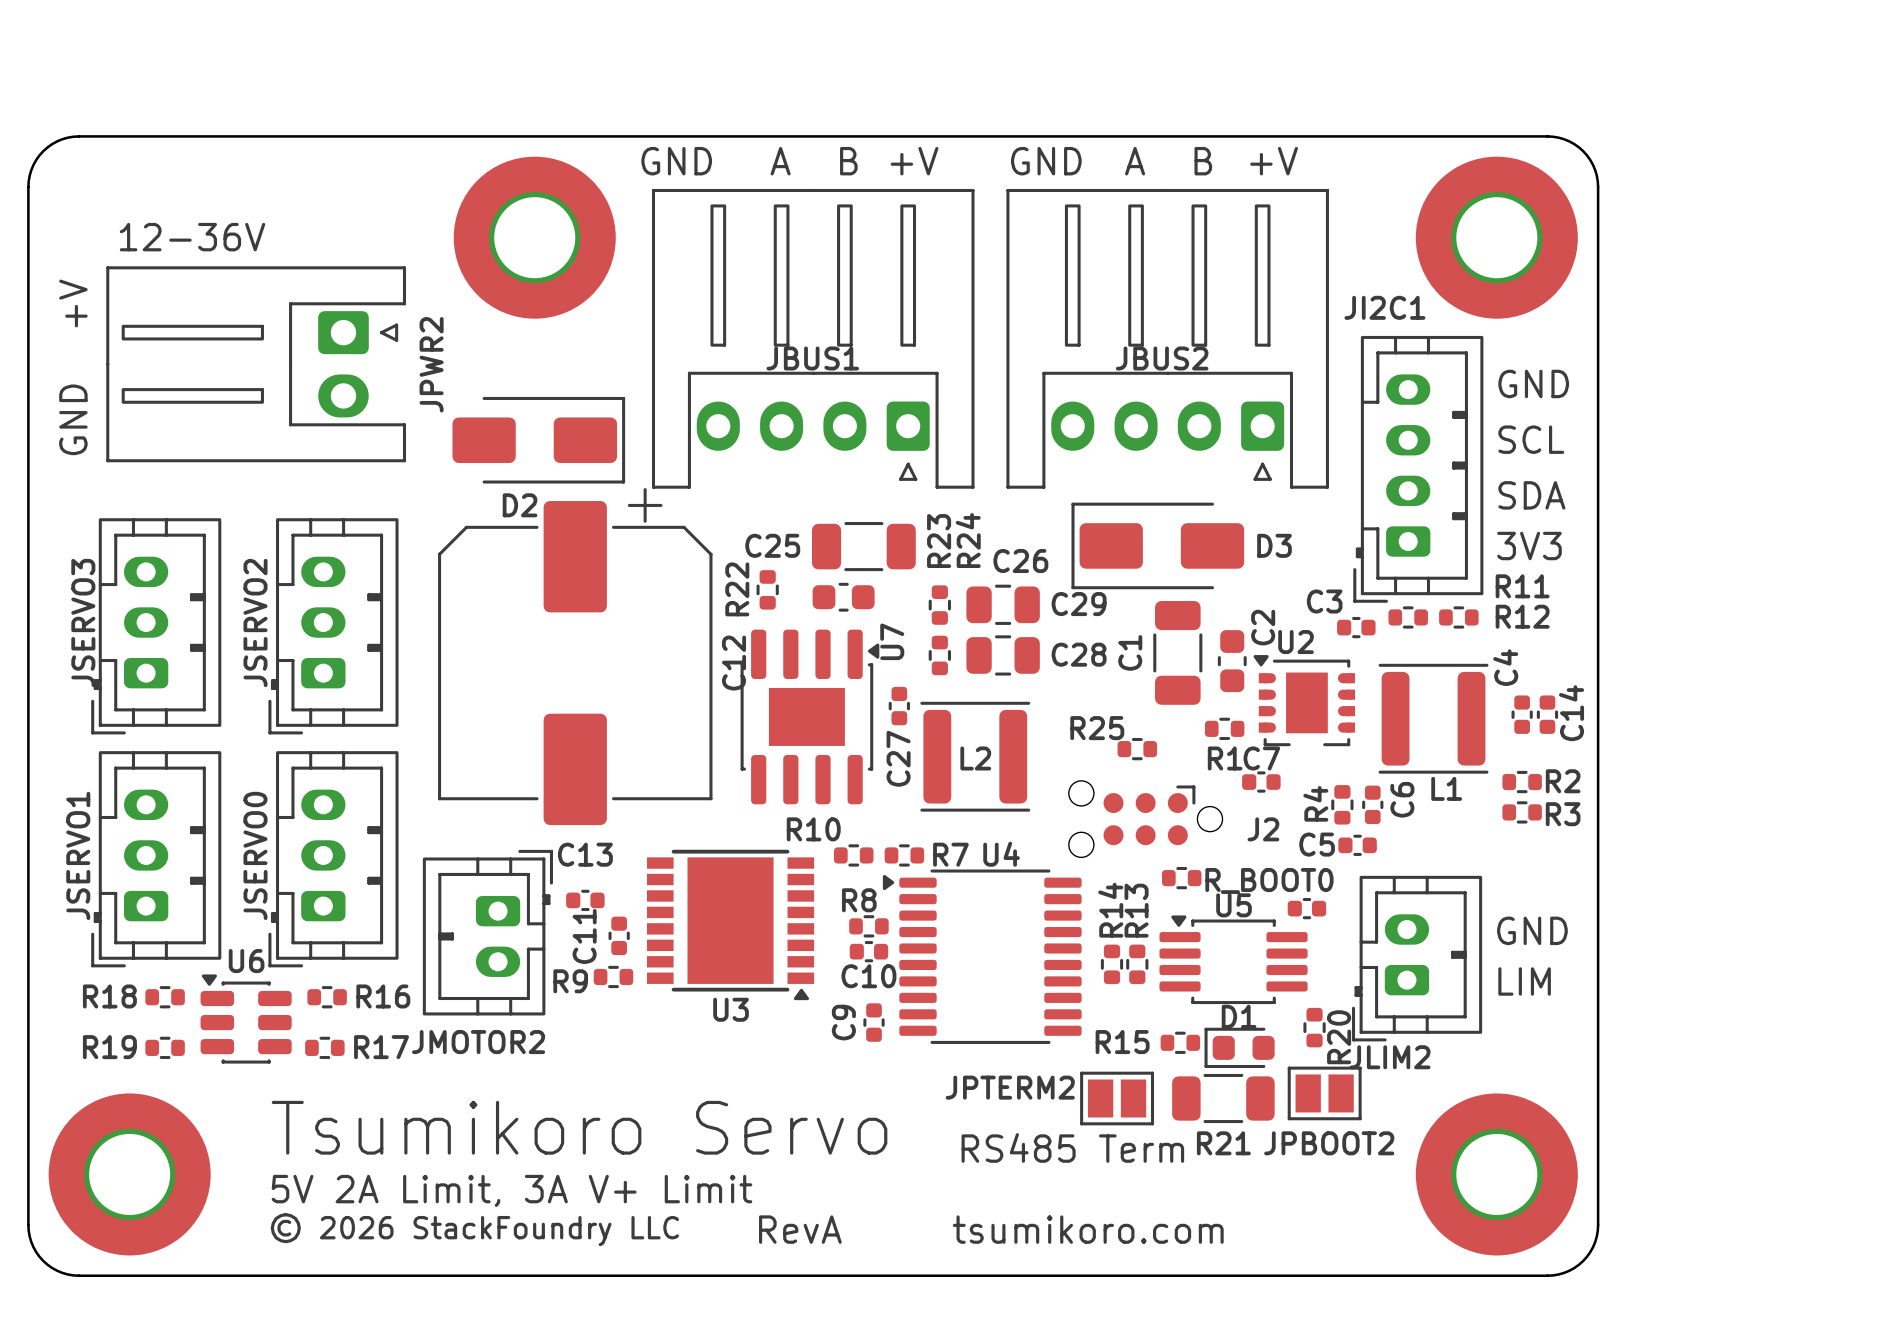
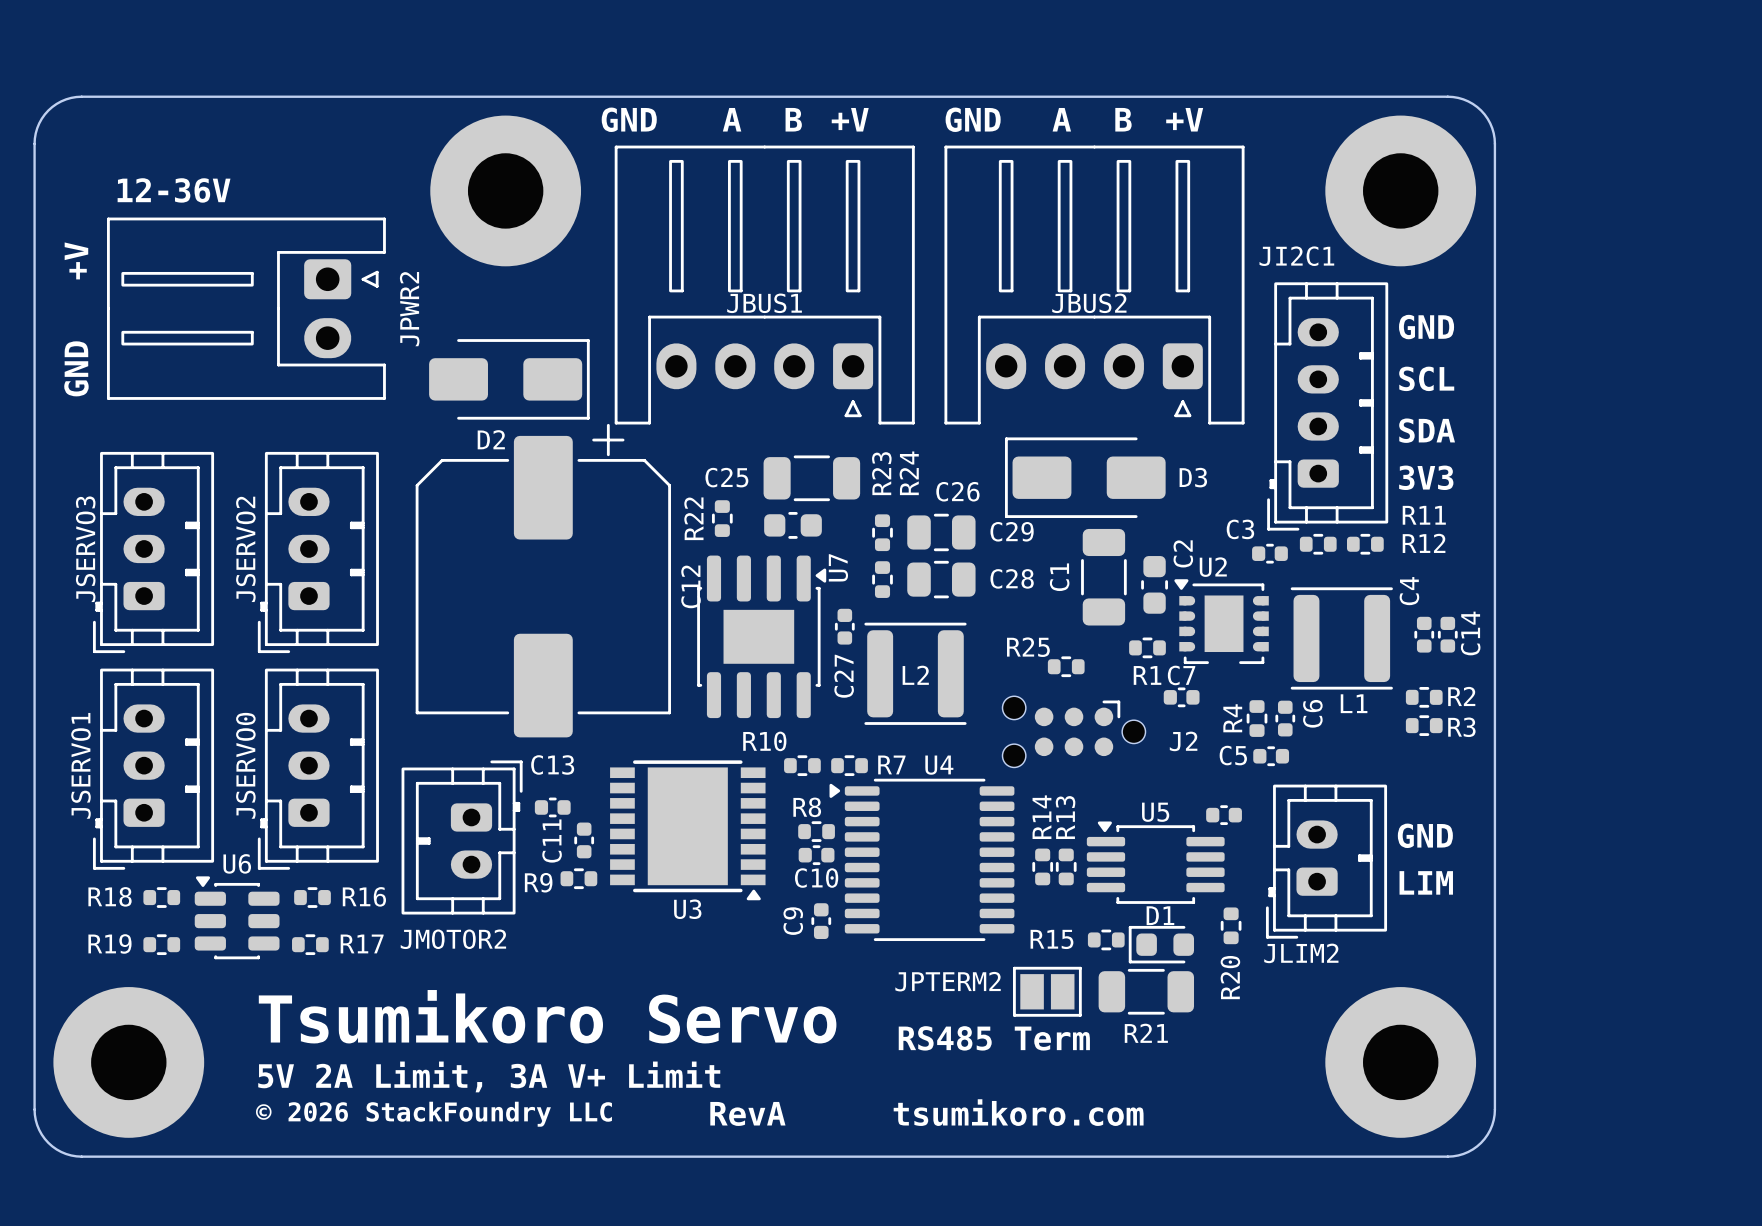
R_BOOT0: (1181, 878) -> none
R20 name position: R20 (1339, 1037) -> R20 (1230, 977)
JPBOOT2: (1324, 1093) -> none

